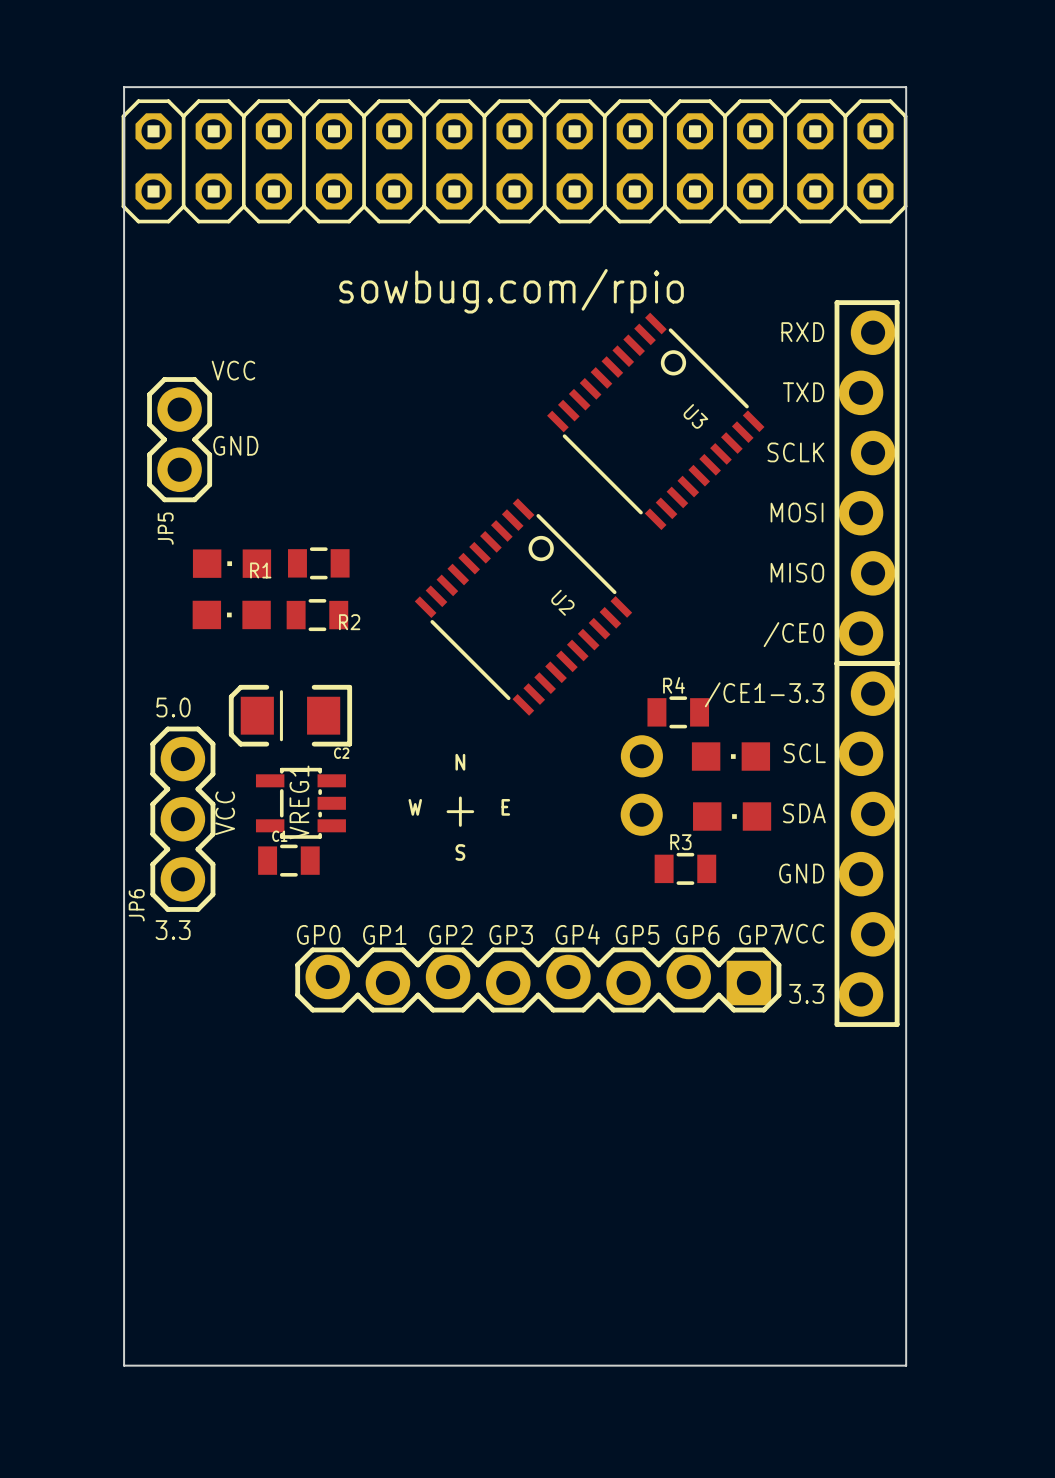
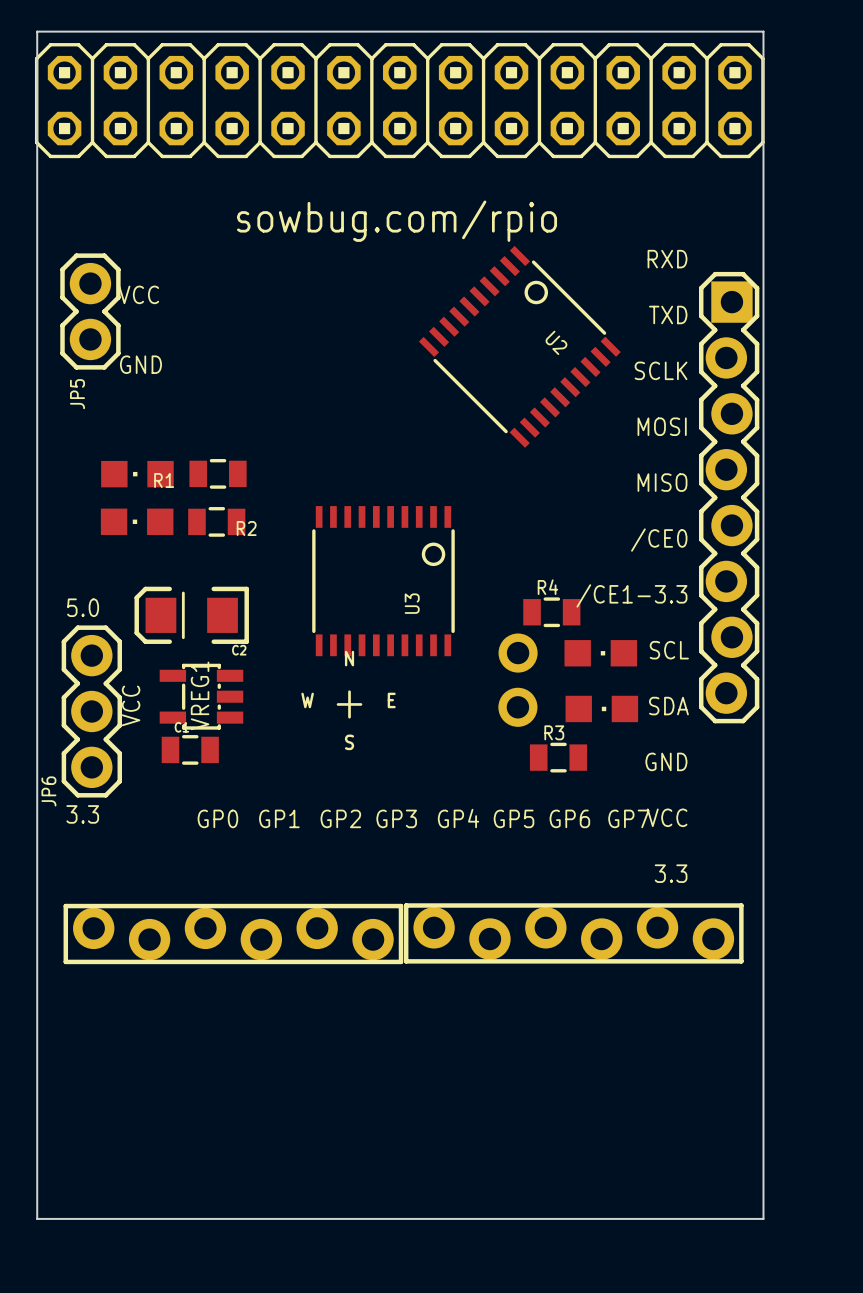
U3 rotation: 0° (655, 421) -> 45° clockwise (383, 581)
U3 position: (655, 421) -> (383, 581)
JP5 position: (179, 439) -> (90, 311)
part: (867, 483) -> none
U2 position: (523, 607) -> (519, 346)
part rotation: 0° (867, 844) -> 90° clockwise (573, 933)
part position: (867, 844) -> (573, 933)
part rotation: 0° (538, 979) -> 90° counterclockwise (729, 497)
part position: (538, 979) -> (729, 497)
part: none -> (233, 933)

